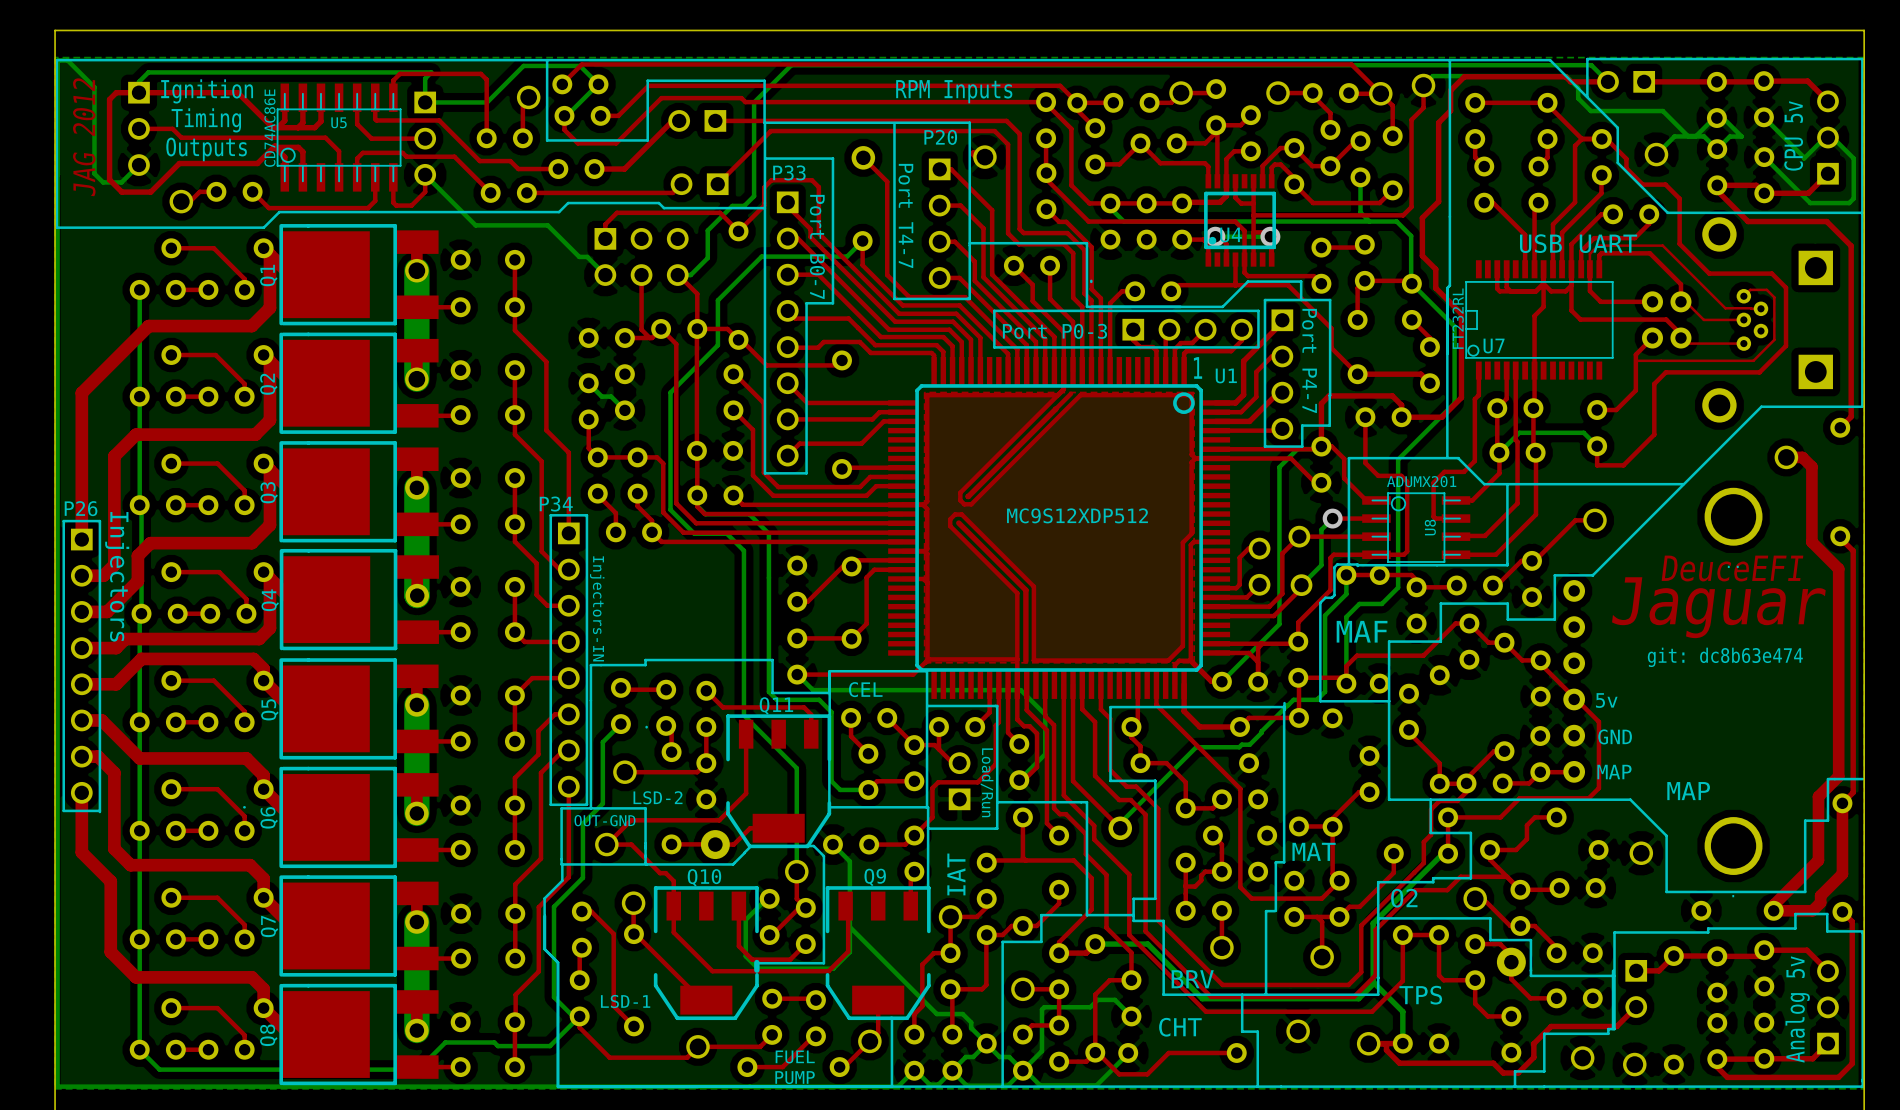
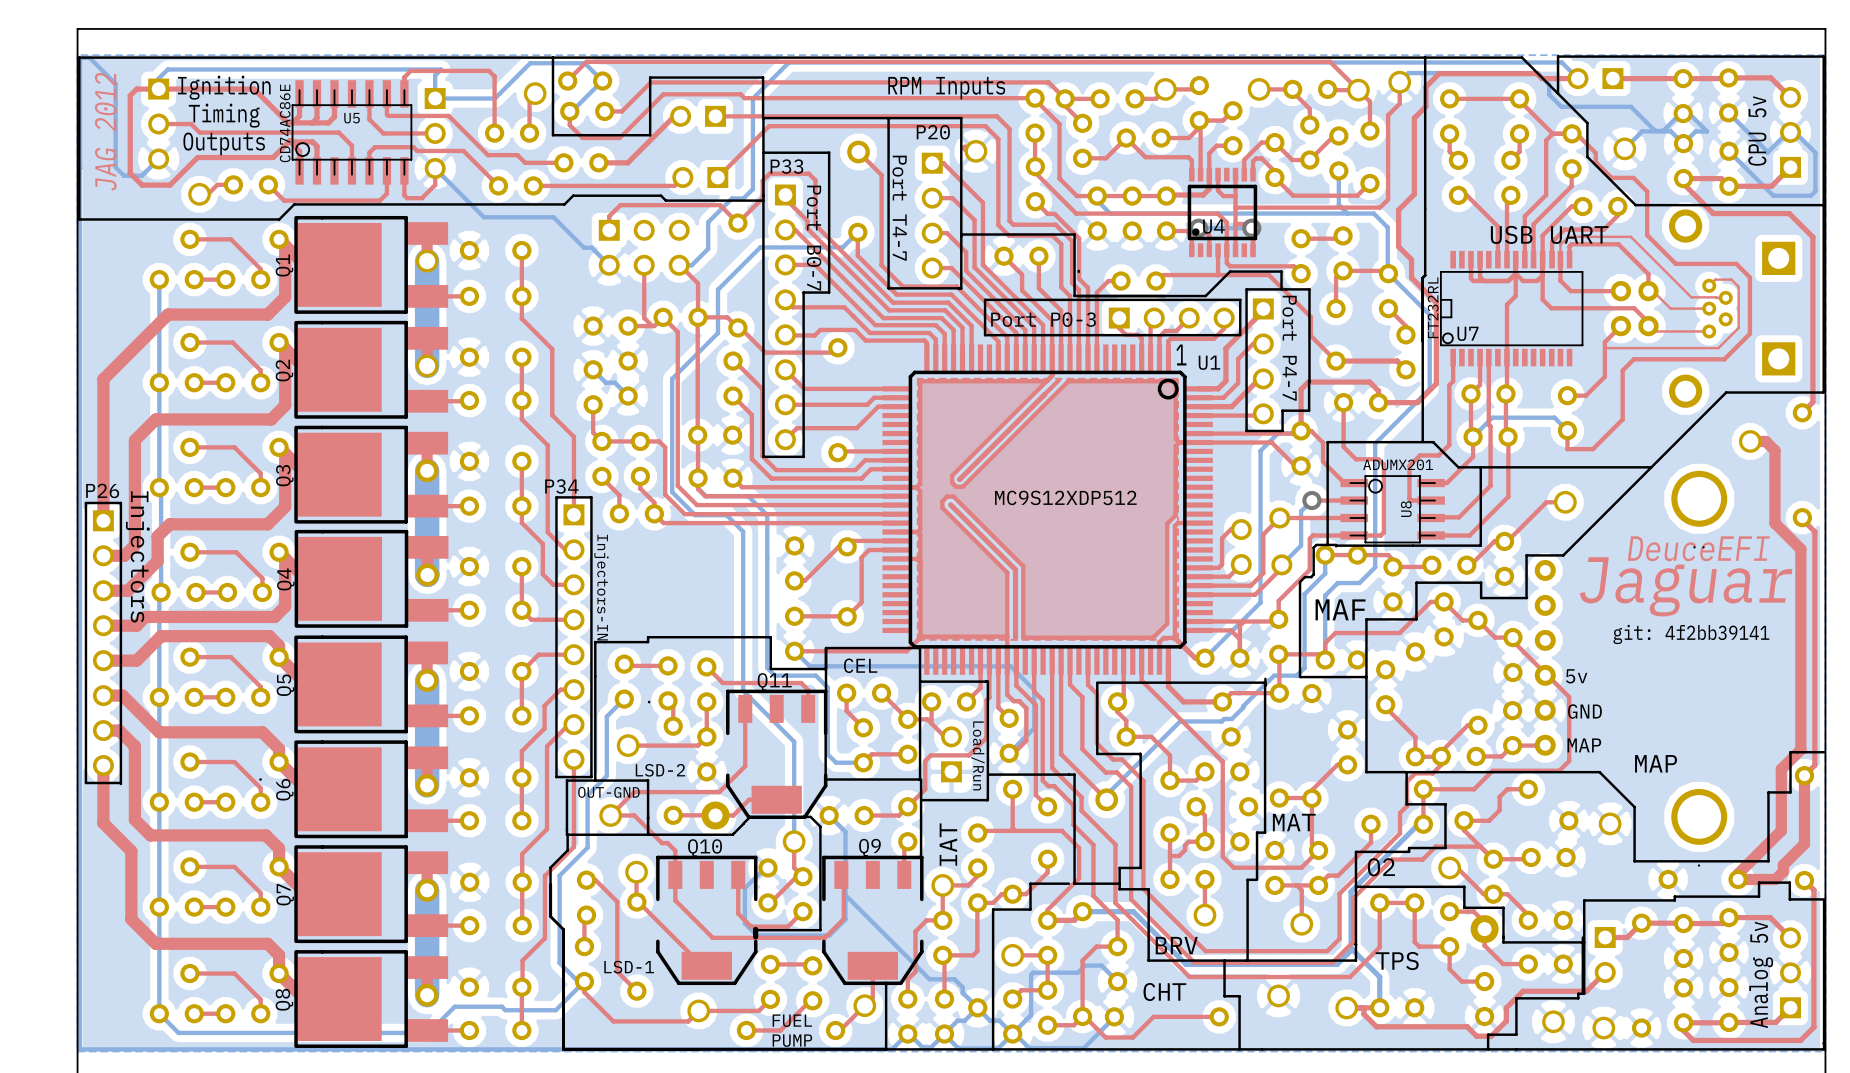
text: git: dc8b63e474 (1725, 657) -> git: 4f2bb39141 (1691, 634)

